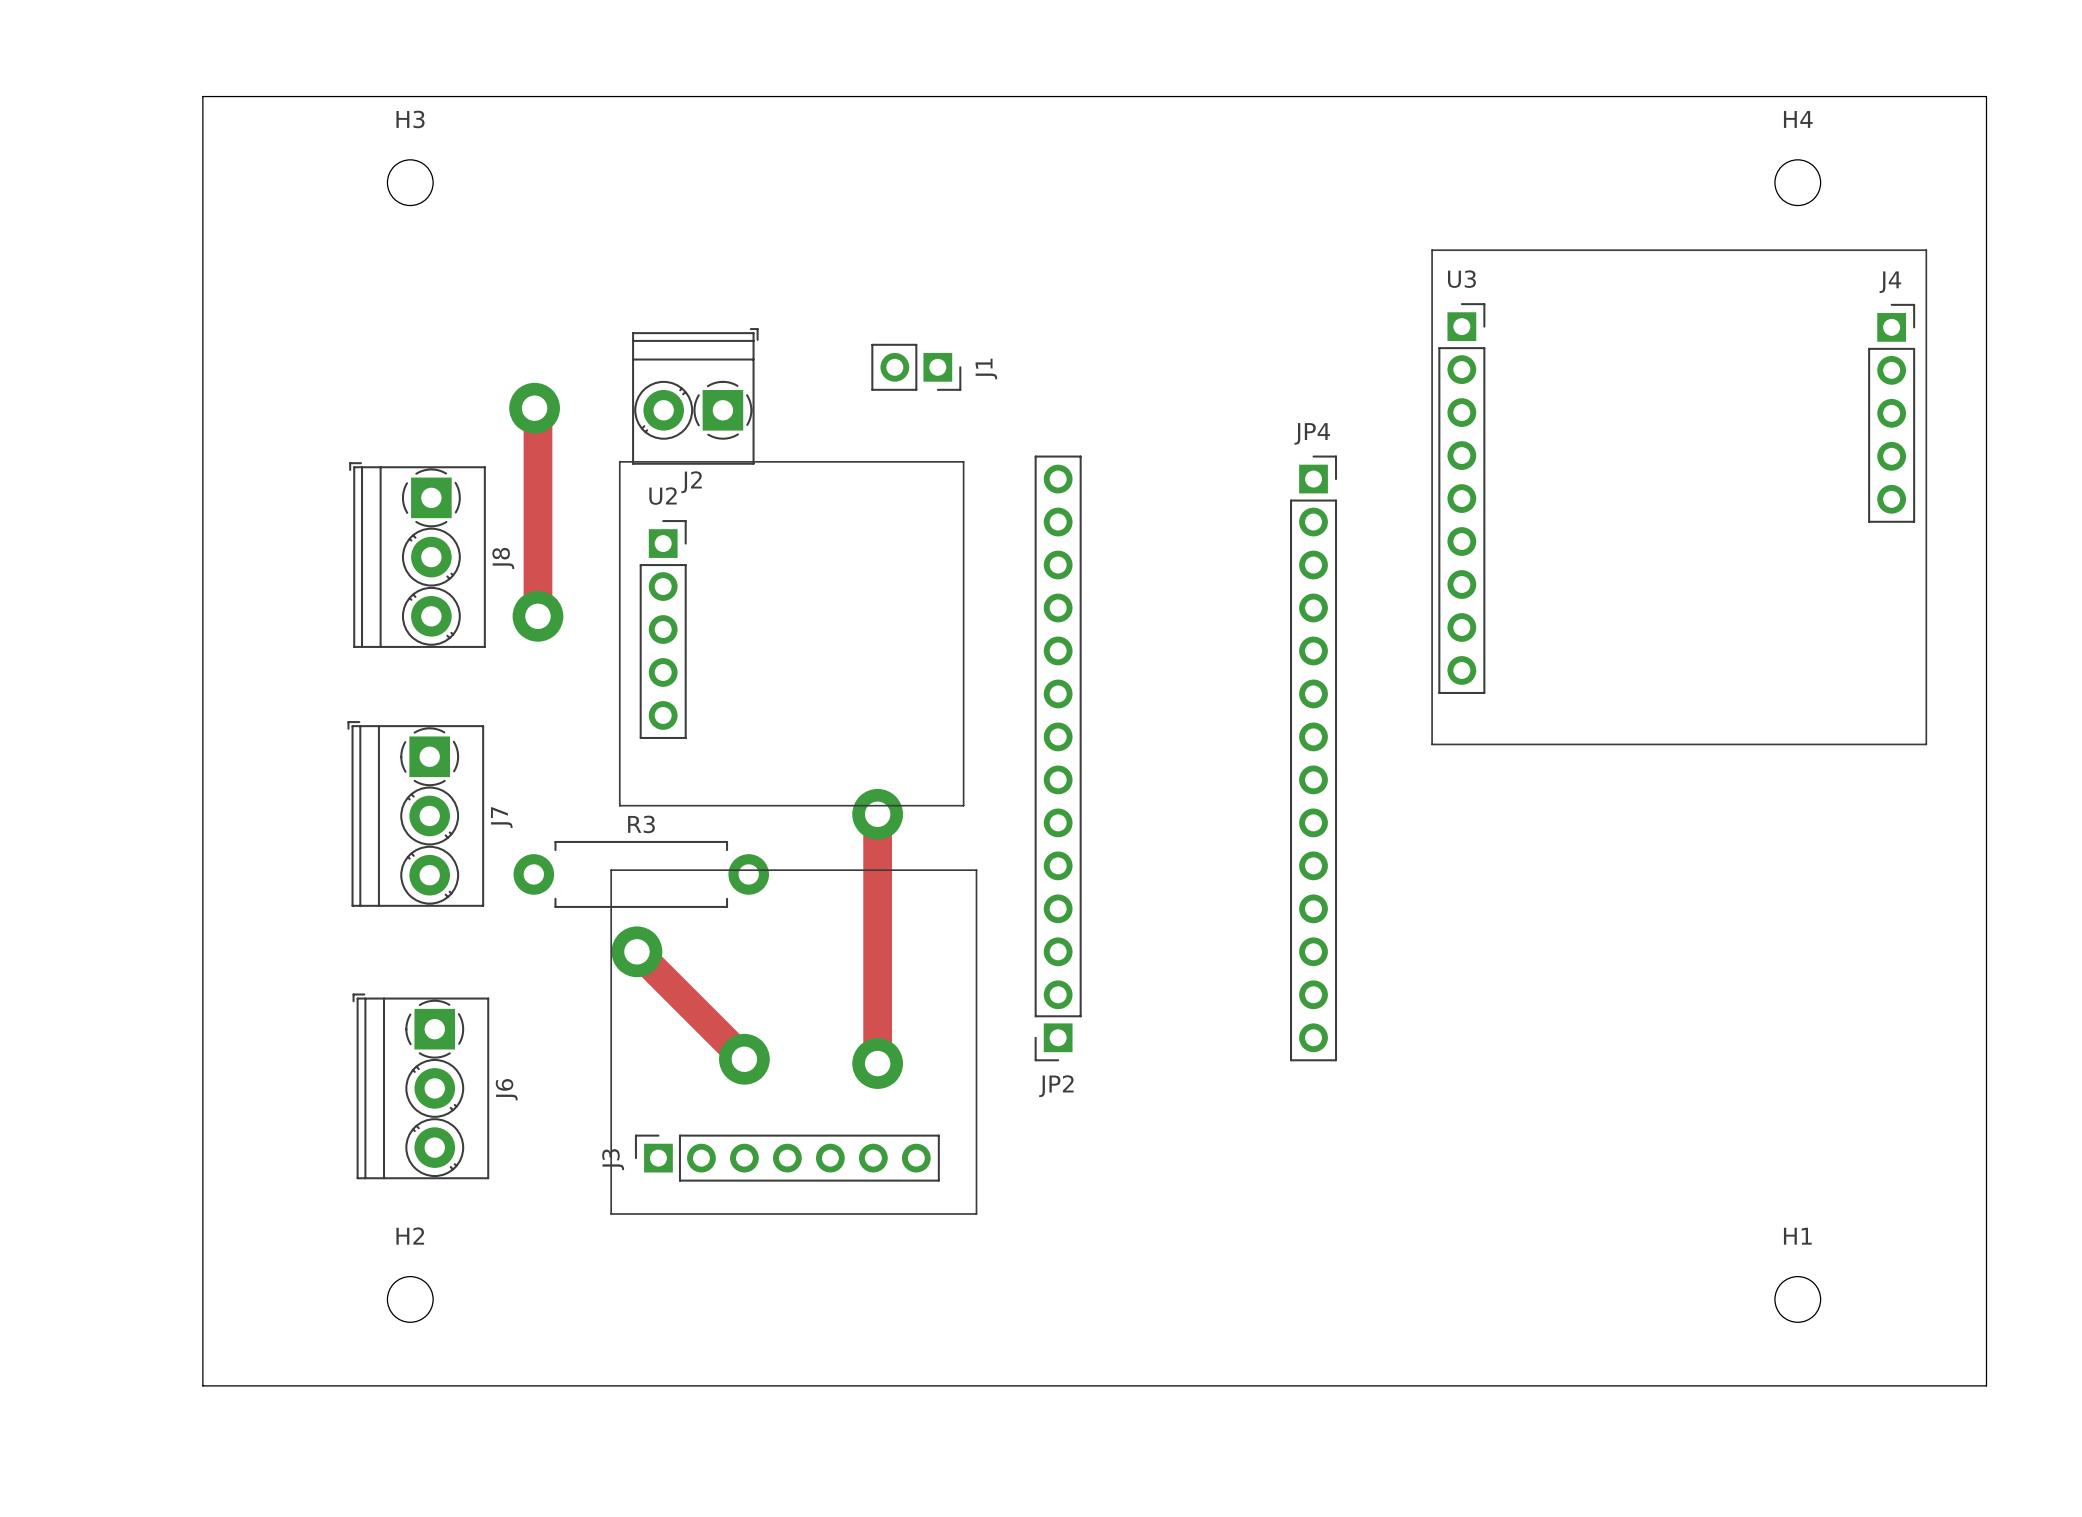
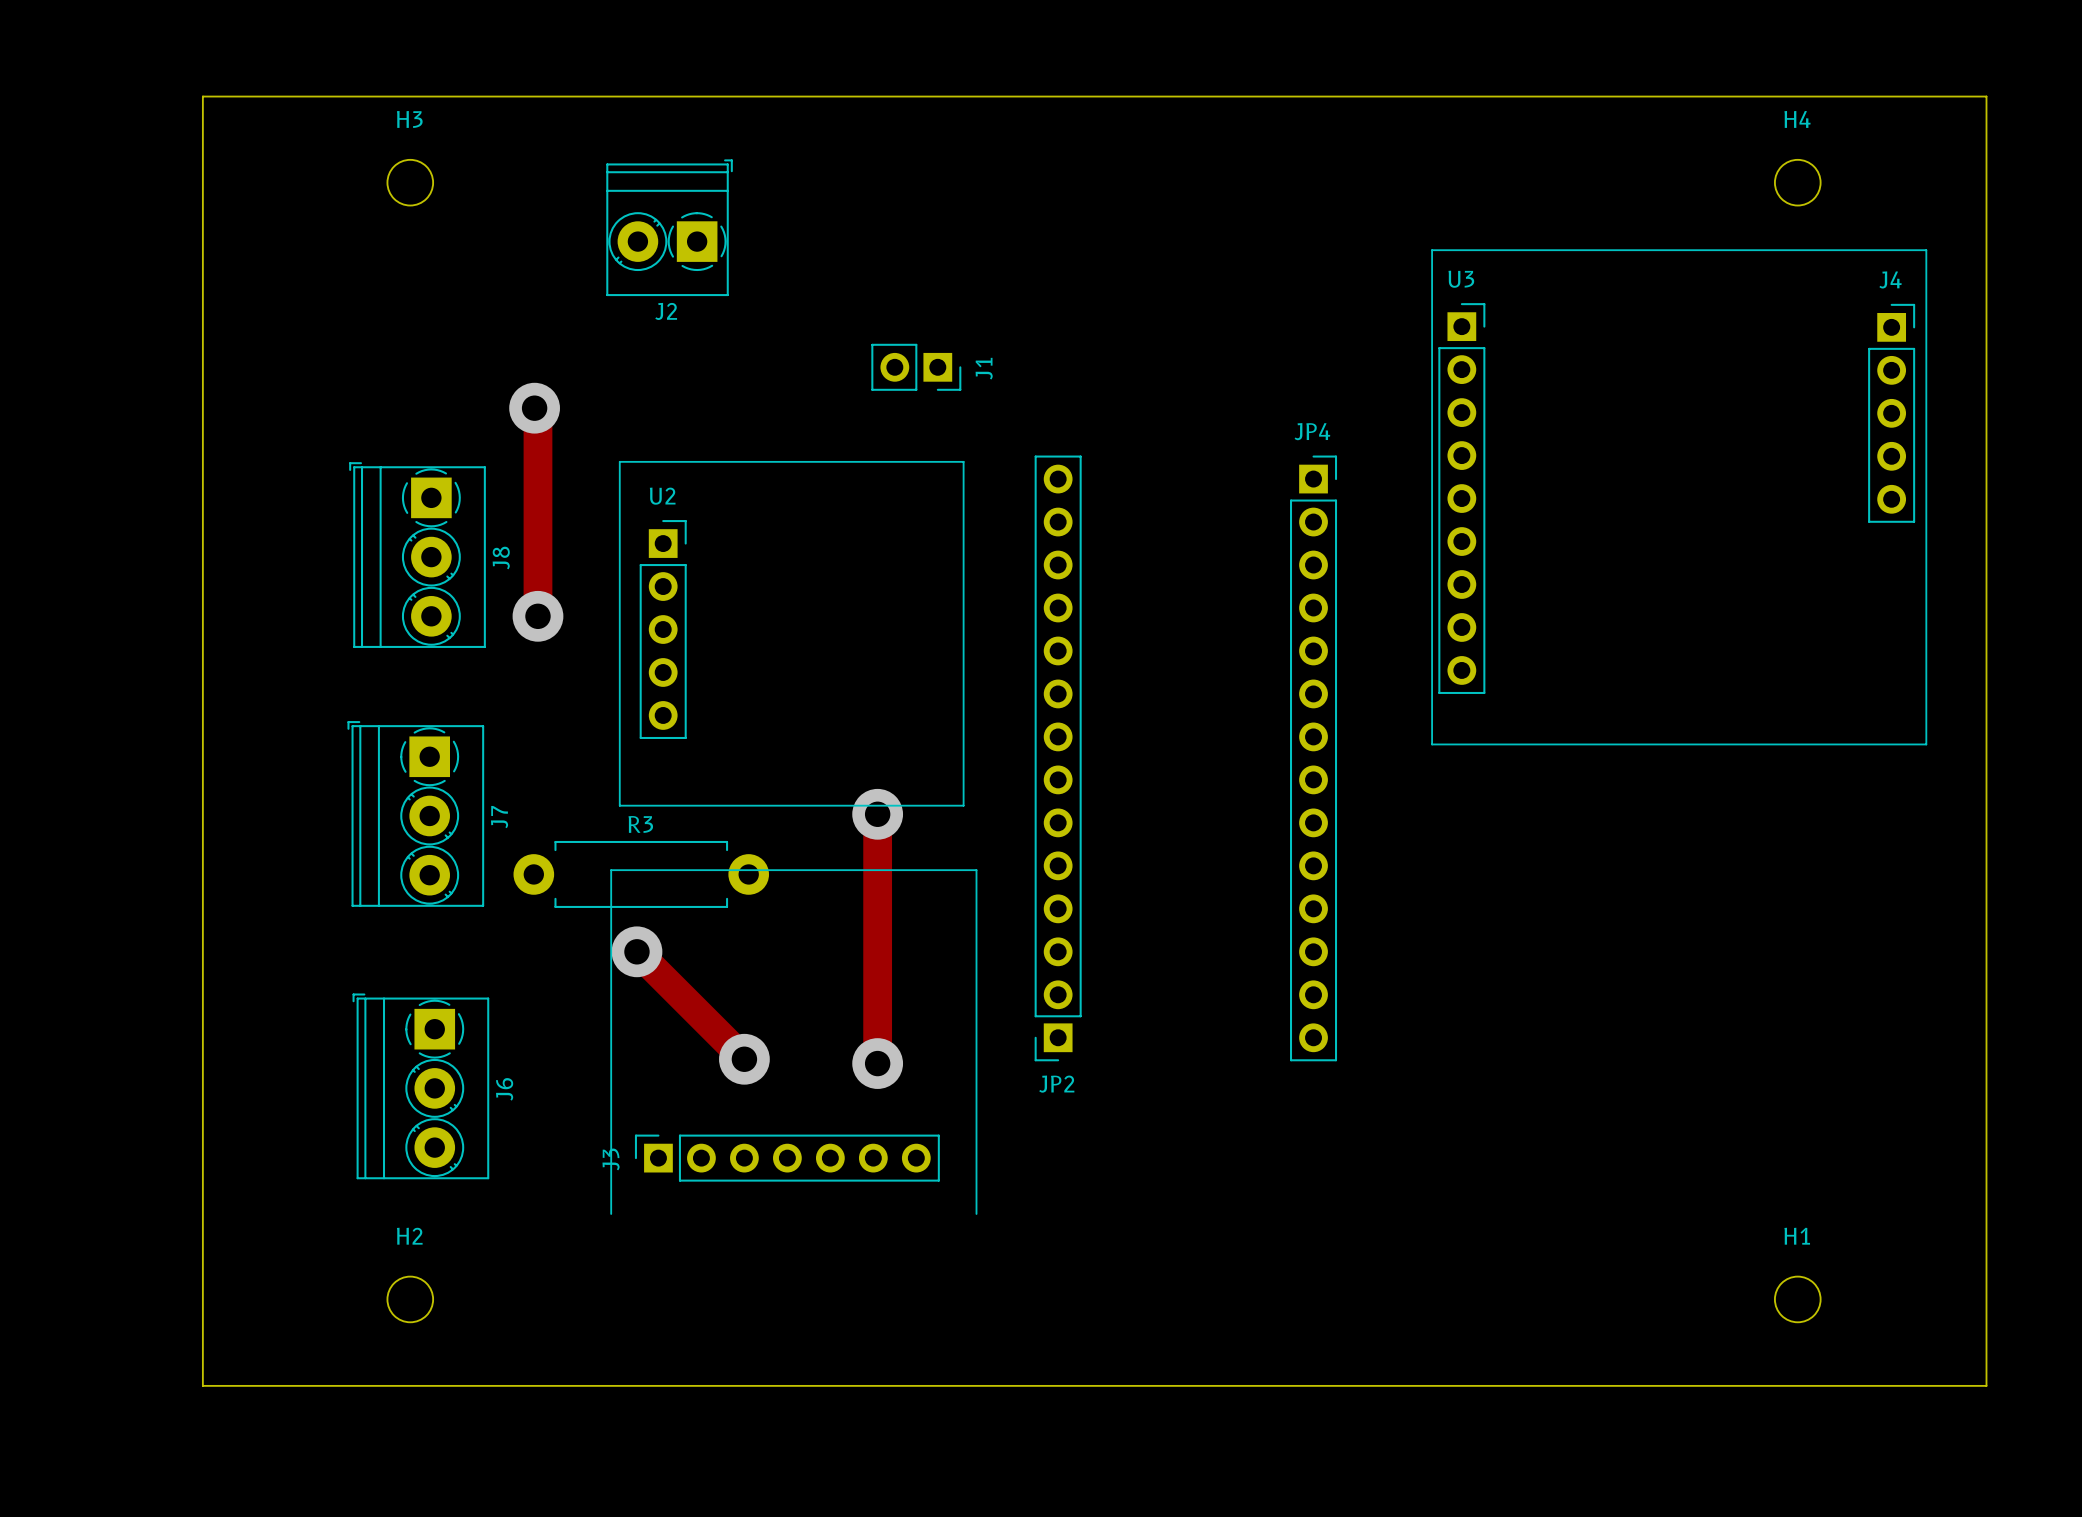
J2 position: (695, 396) -> (669, 227)
line: (611, 1213) (976, 1213) -> none

